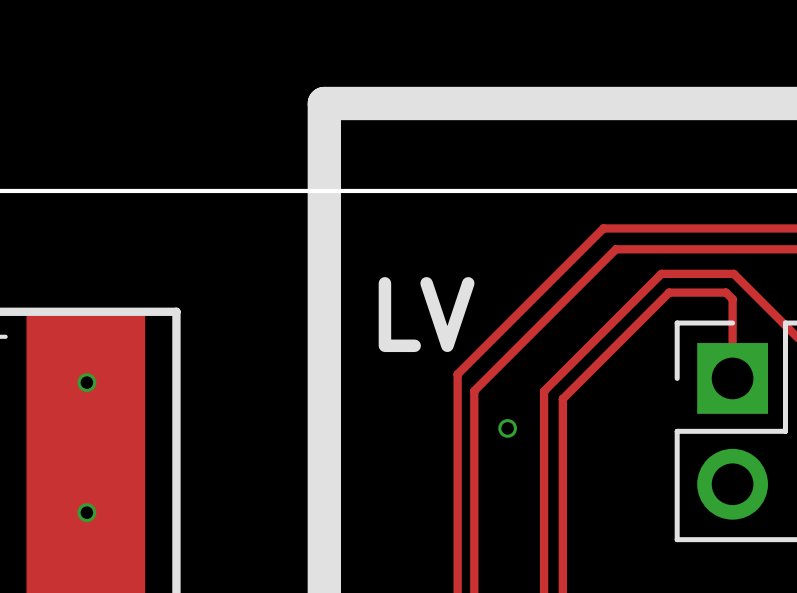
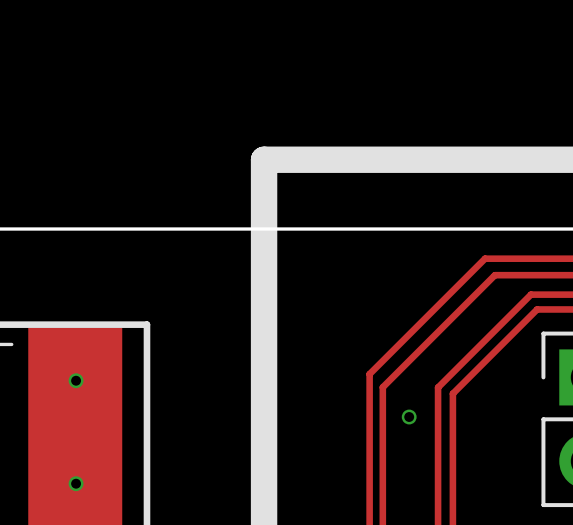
text: LV (426, 314) -> none

